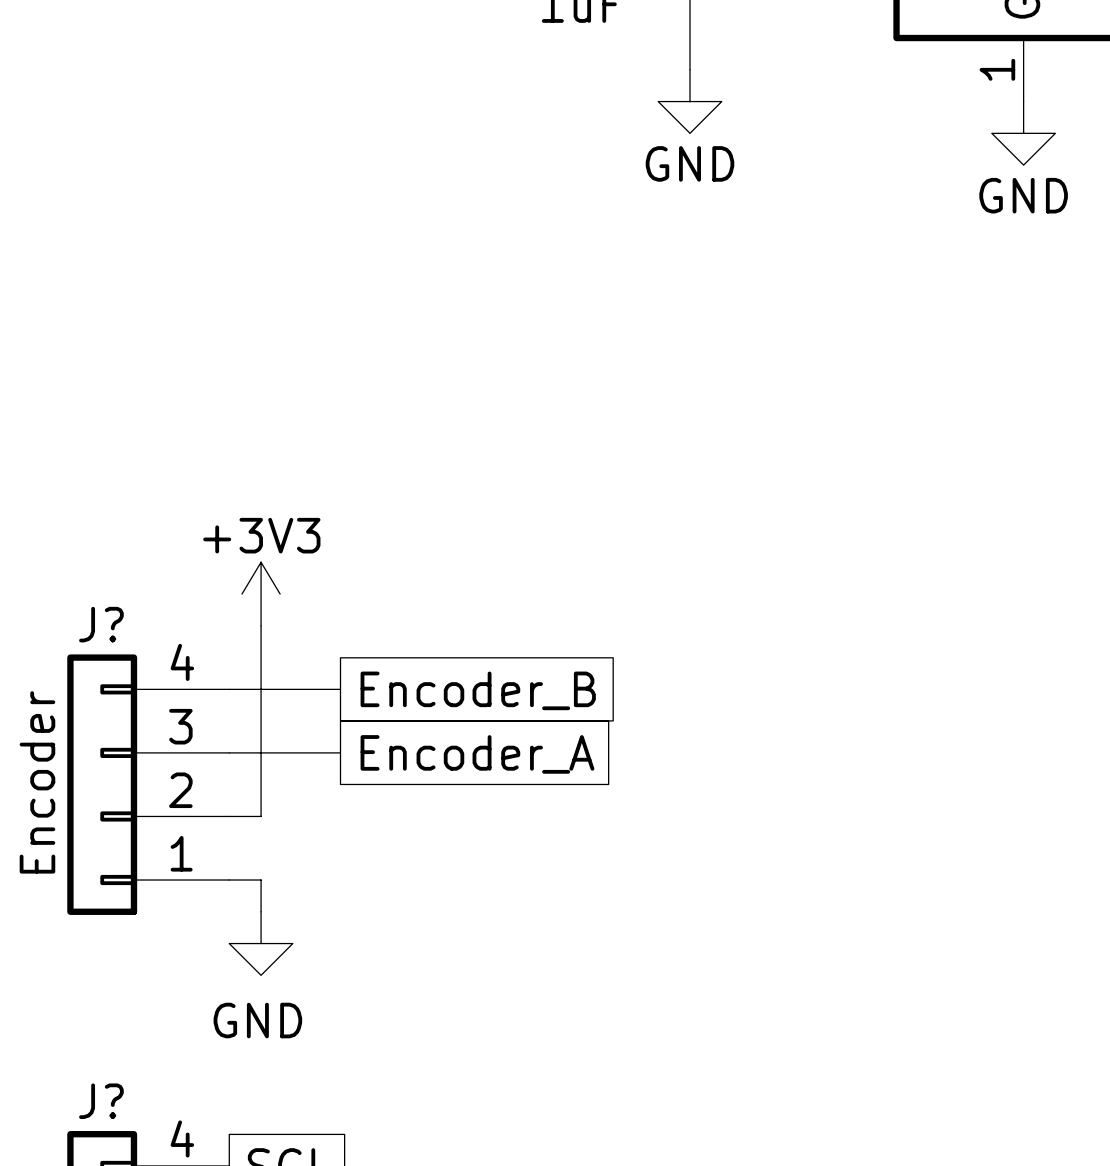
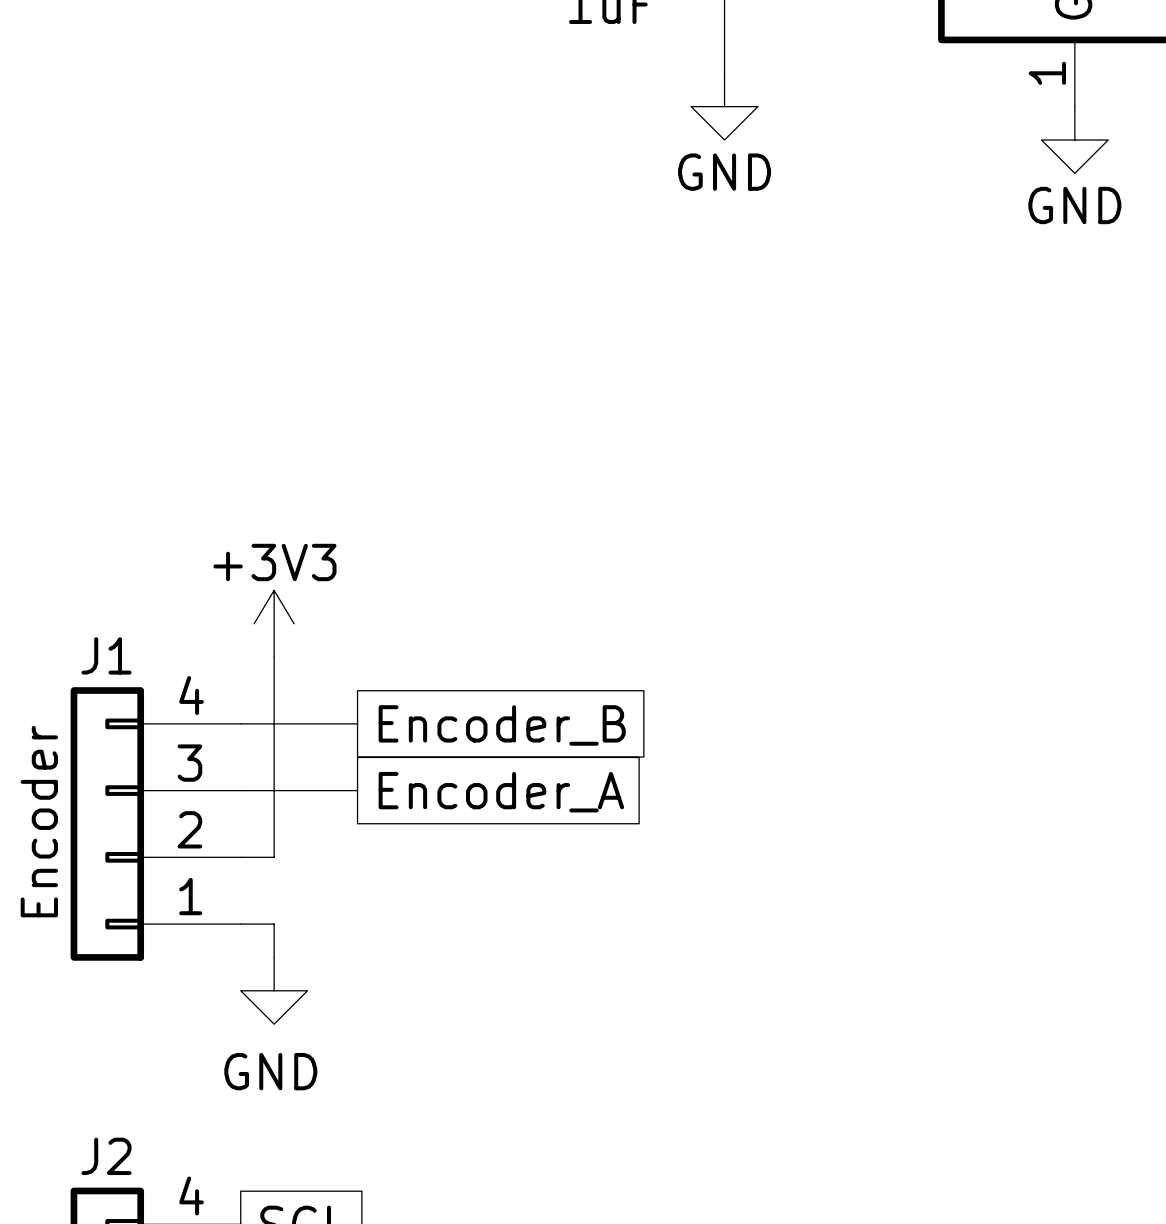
J? name: J? (101, 624) -> J1 (106, 655)
J? name: J? (101, 1101) -> J2 (106, 1156)

